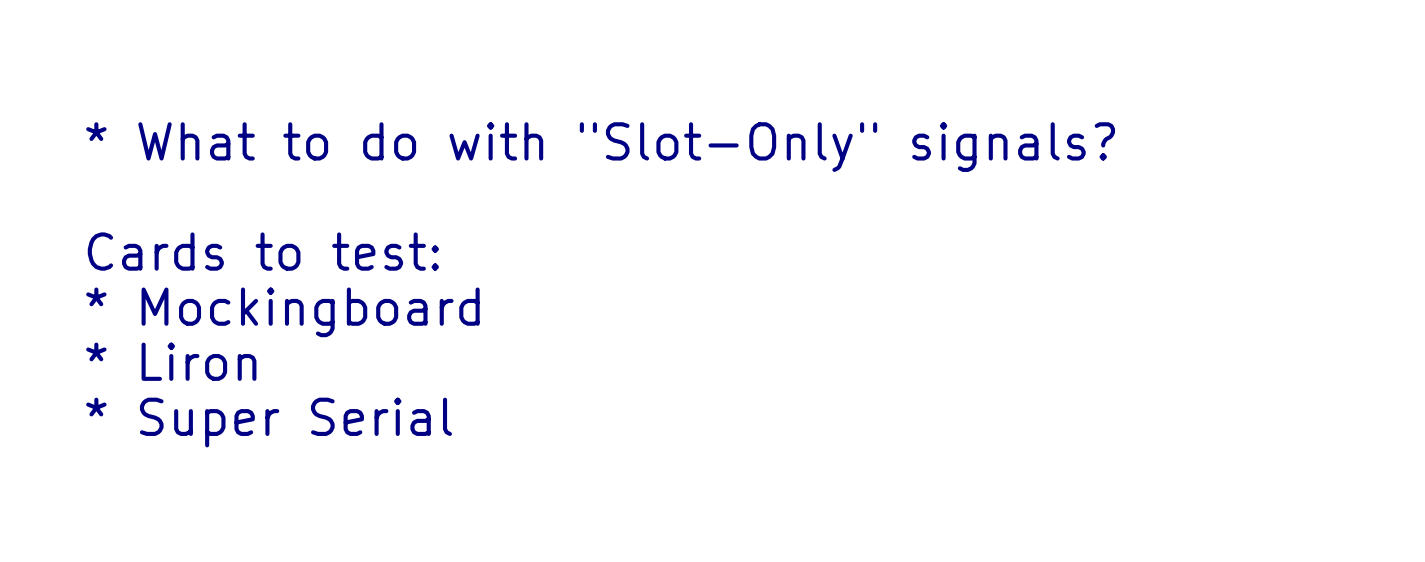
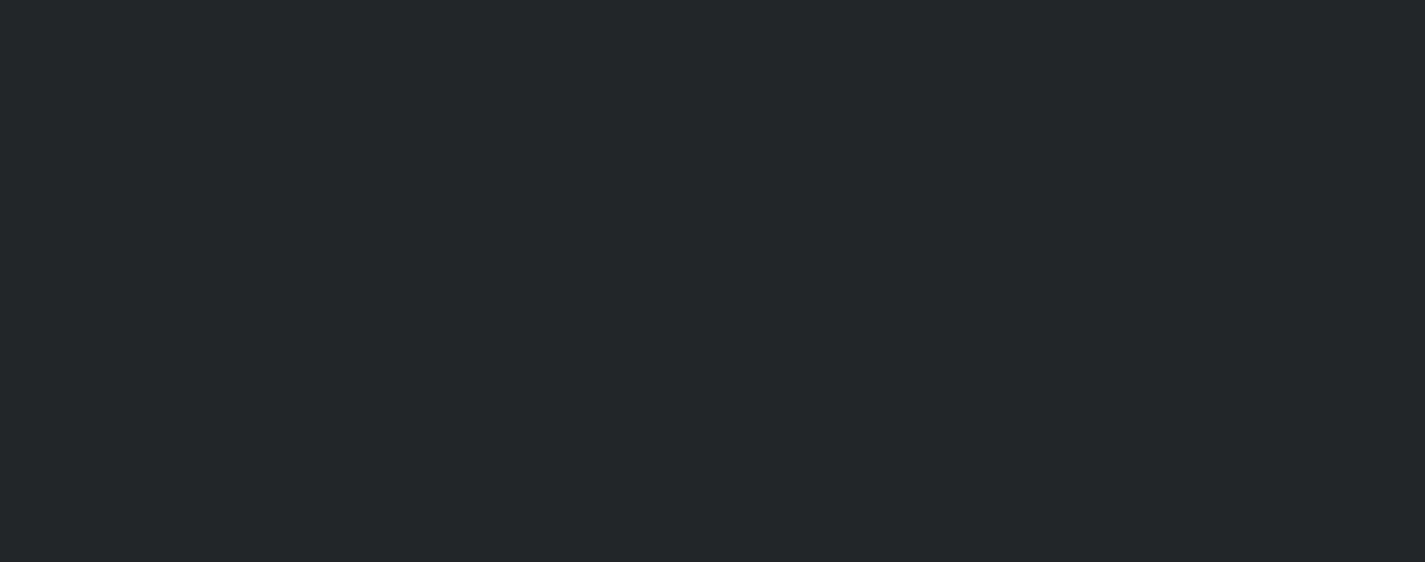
text: * What to do with "Slot-Only" signals? (600, 147) -> none
text: Cards to test: (263, 251) -> none
text: * Mockingboard (282, 312) -> none
text: * Liron (171, 361) -> none
text: * Super Serial (269, 422) -> none

